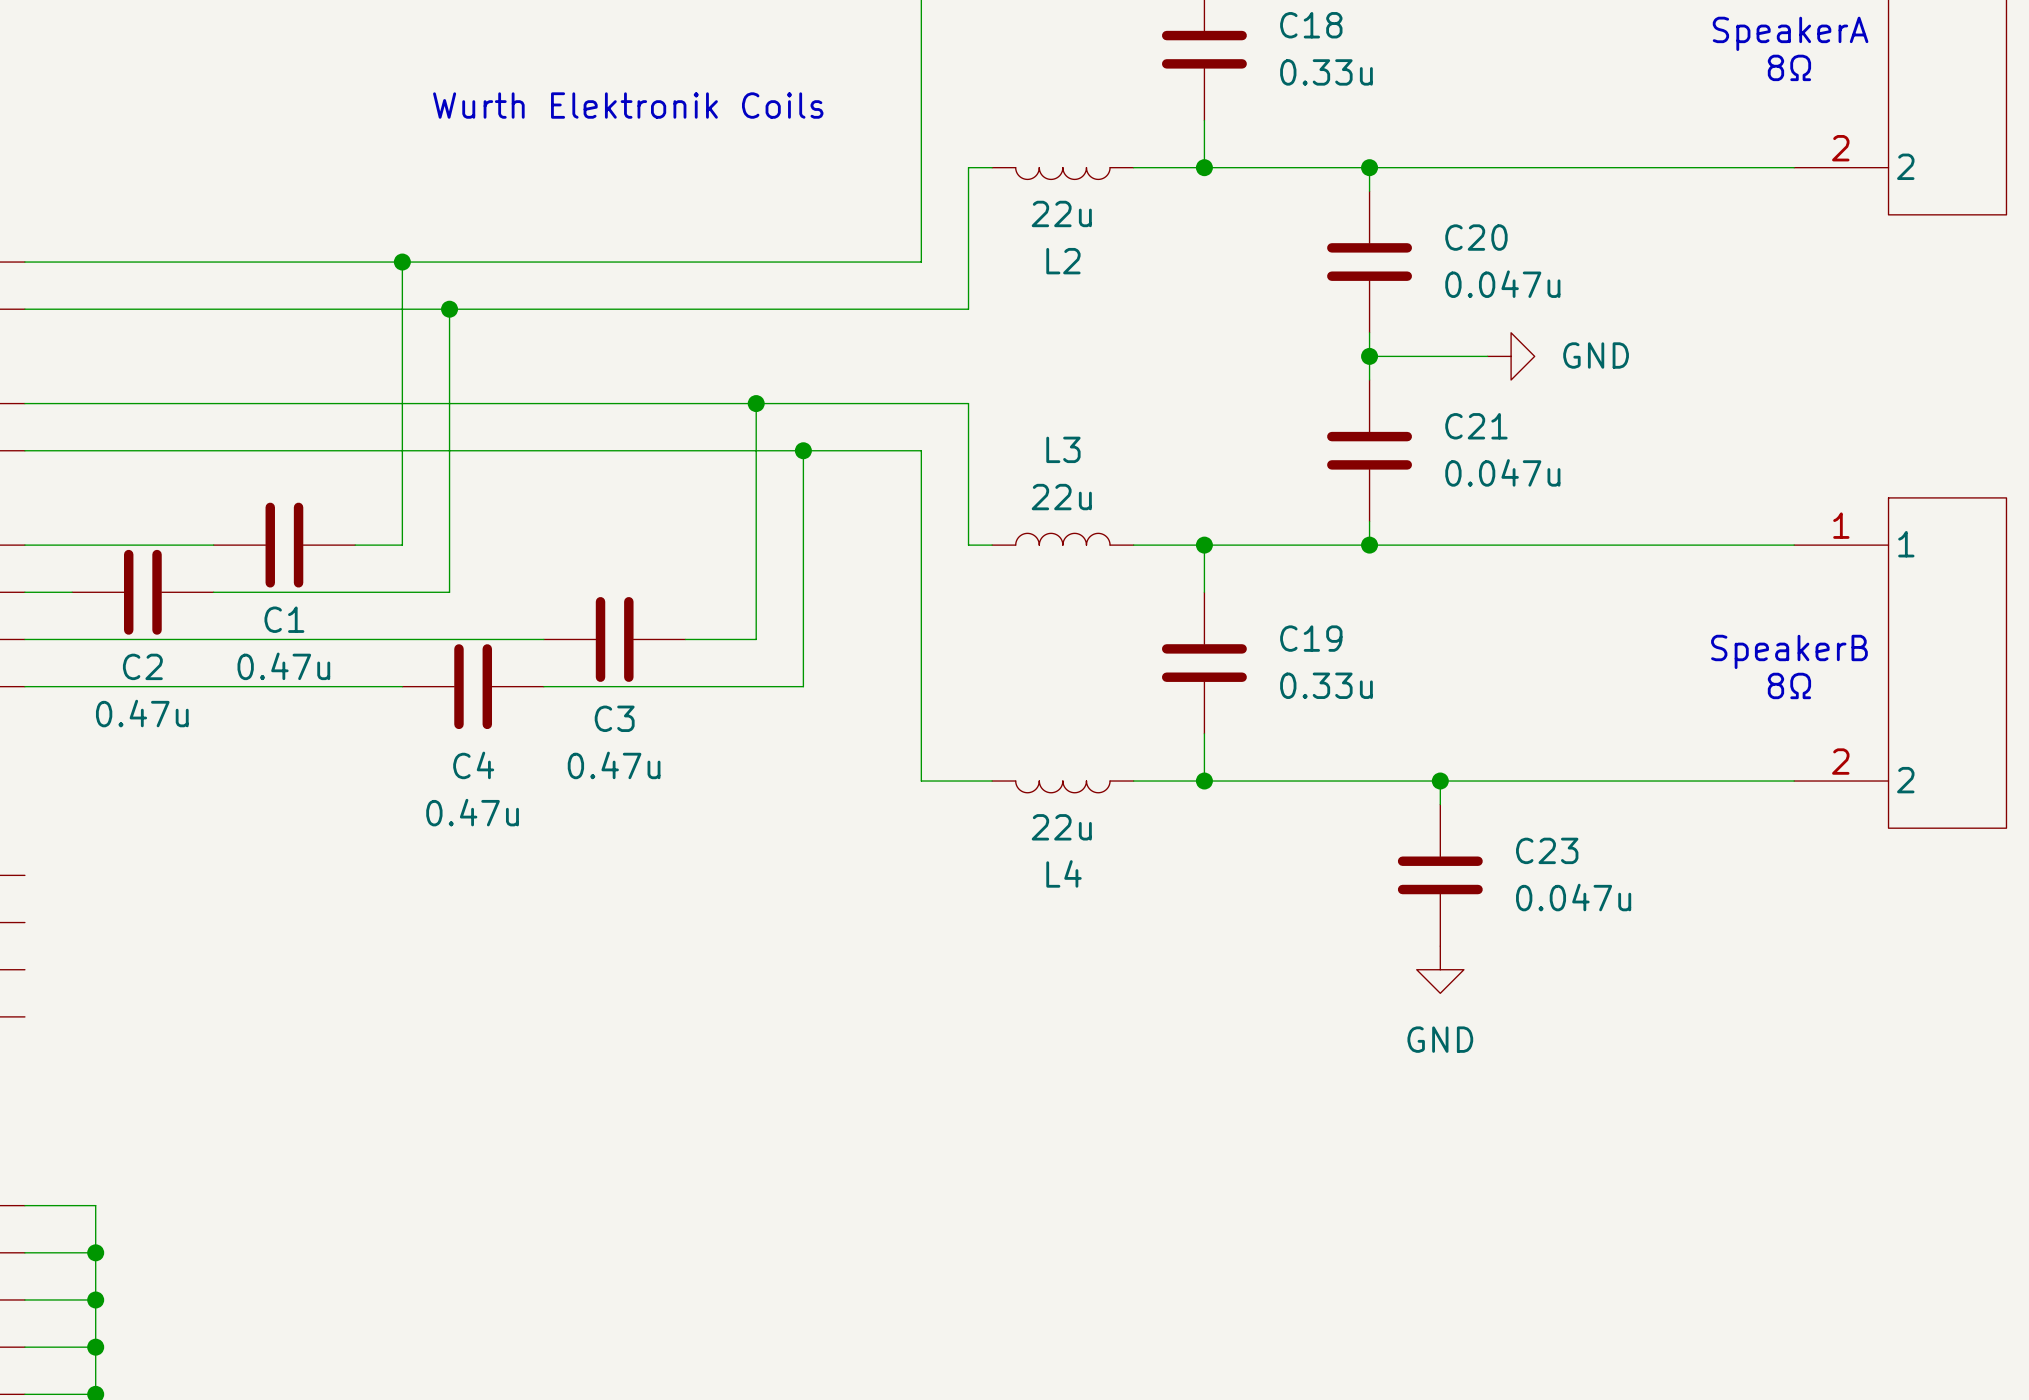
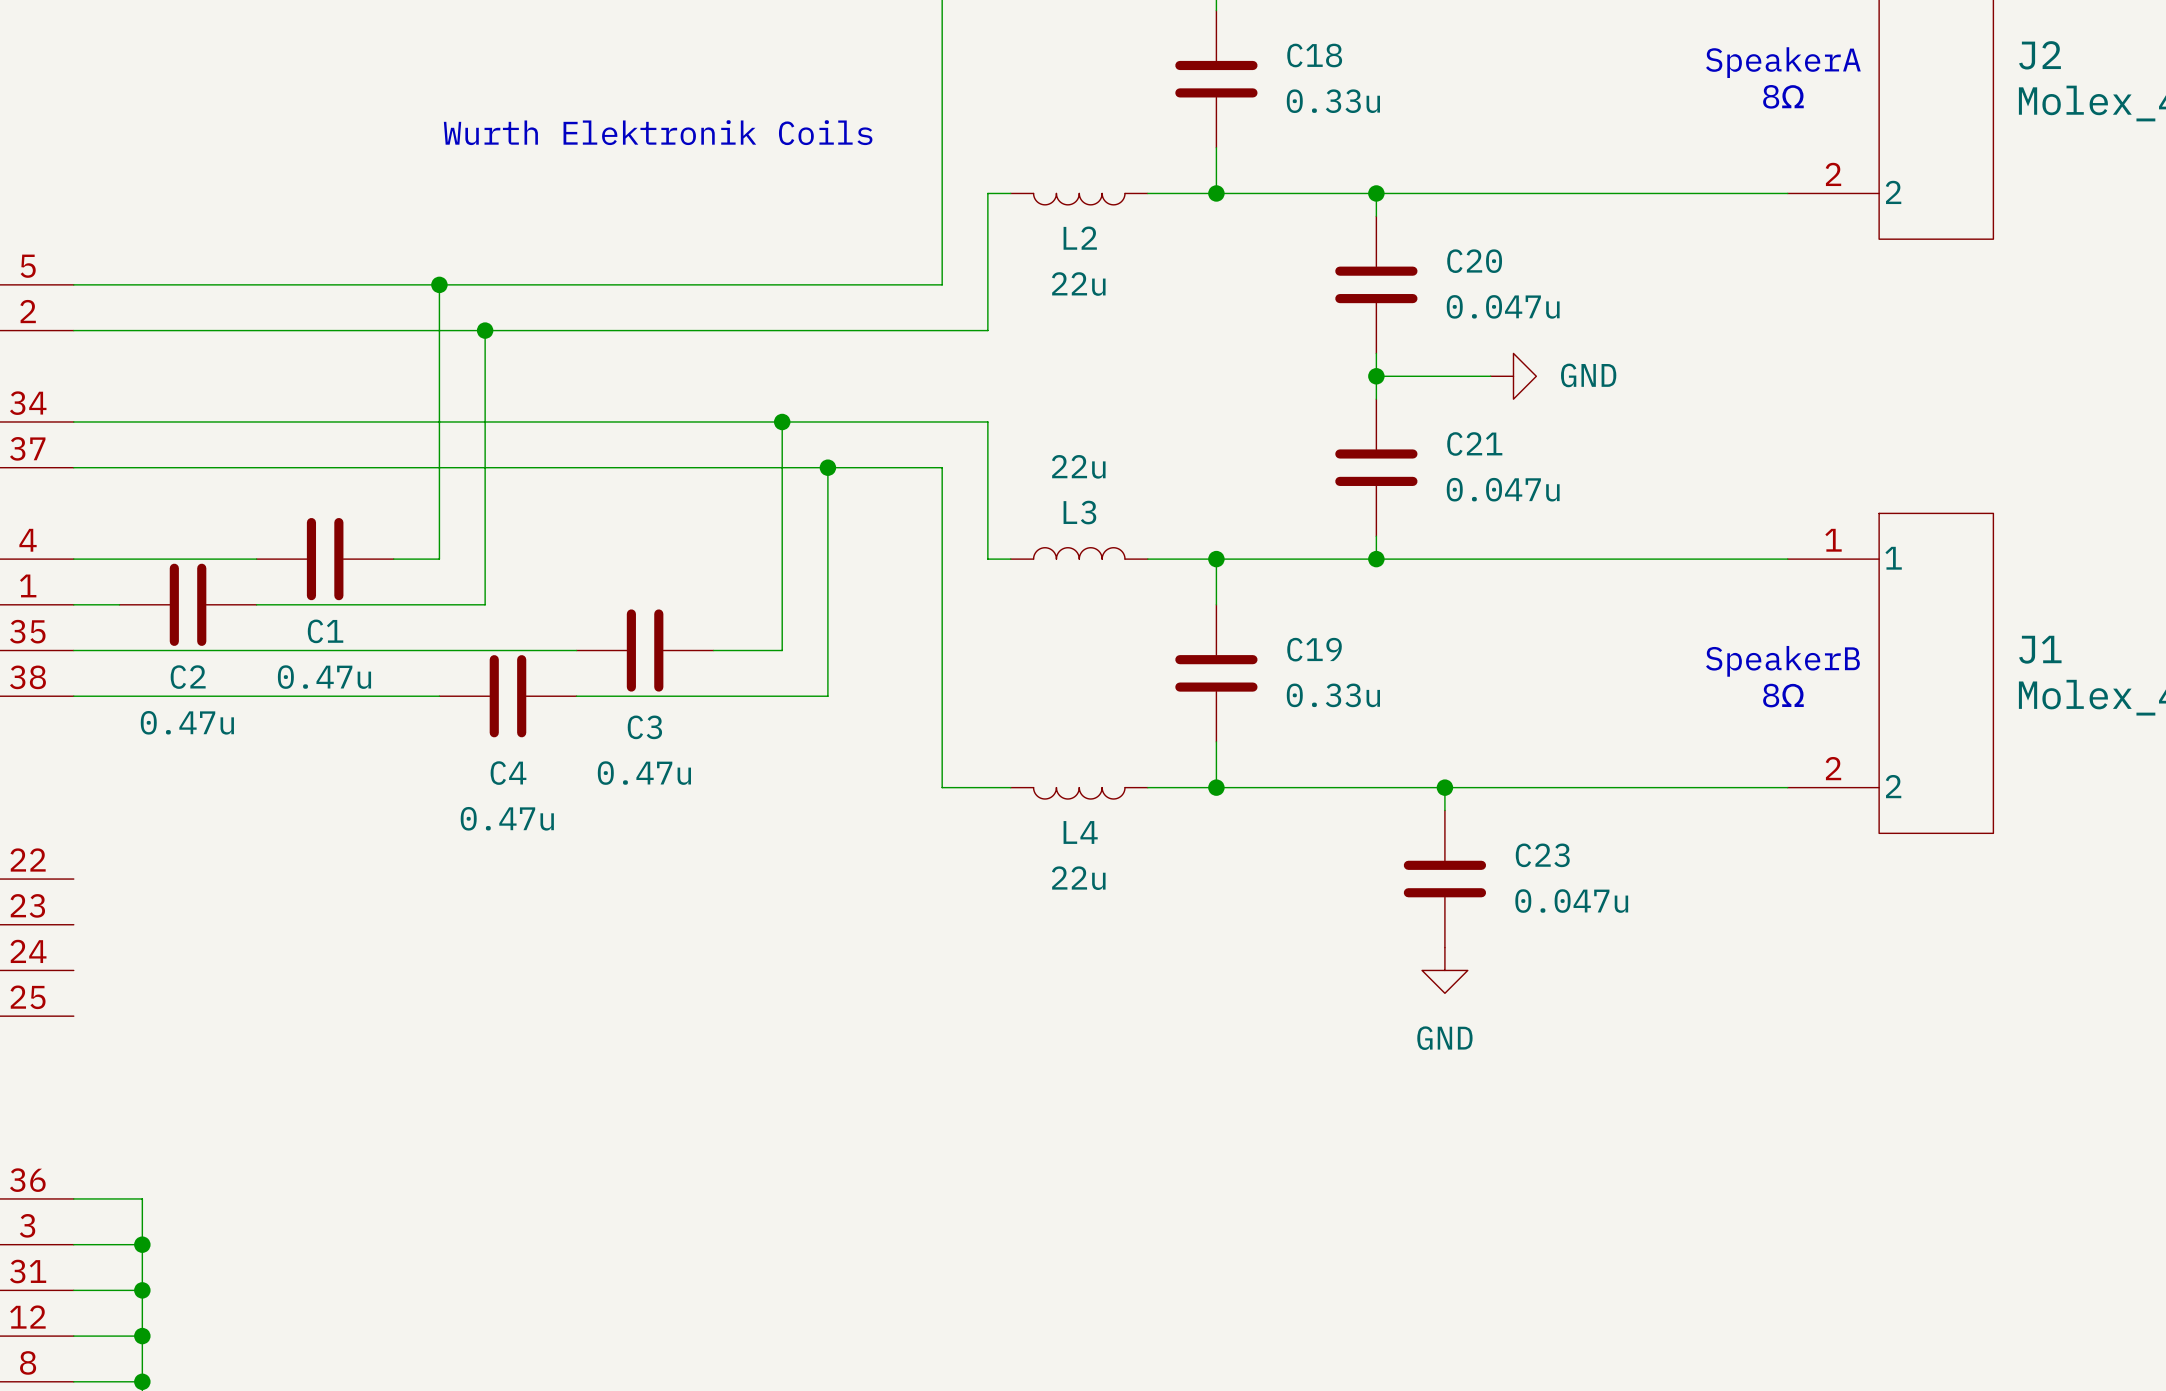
L2 value position: 22u (1061, 213) -> 22u (1078, 284)
L2 name position: L2 (1063, 261) -> L2 (1080, 238)
L3 name position: L3 (1063, 449) -> L3 (1079, 512)
L3 value position: 22u (1061, 497) -> 22u (1078, 466)
L4 value position: 22u (1061, 827) -> 22u (1078, 878)
L4 name position: L4 (1064, 873) -> L4 (1080, 832)

